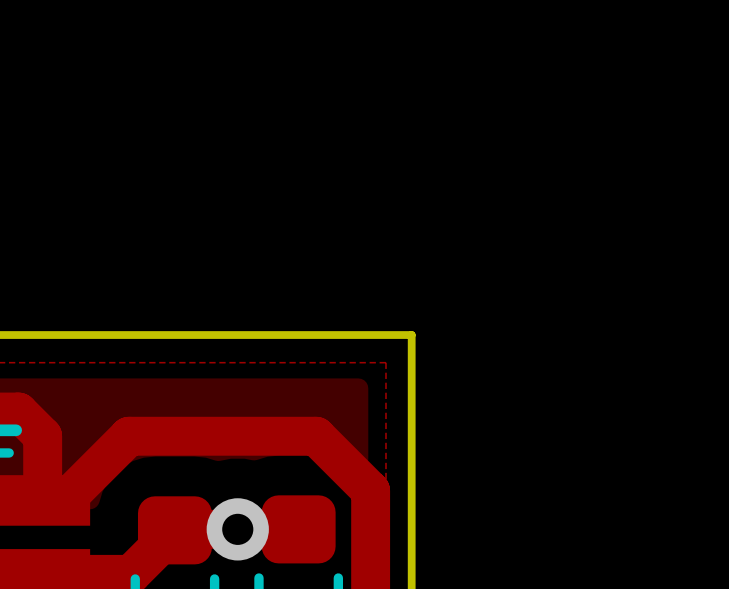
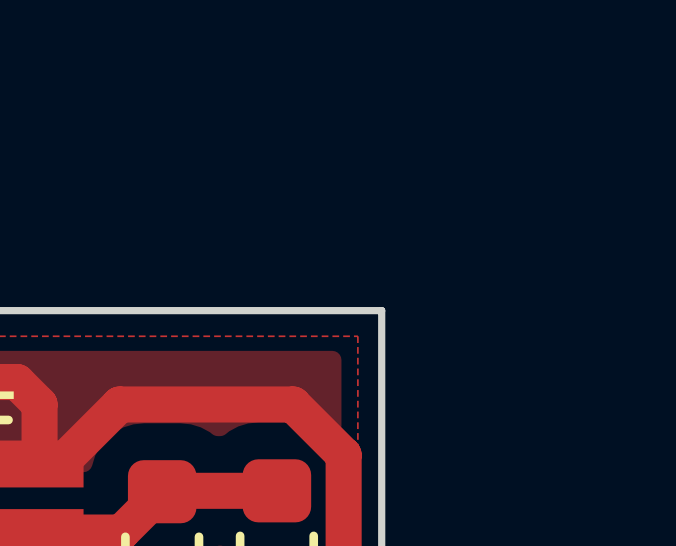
via: (237, 529) -> none

